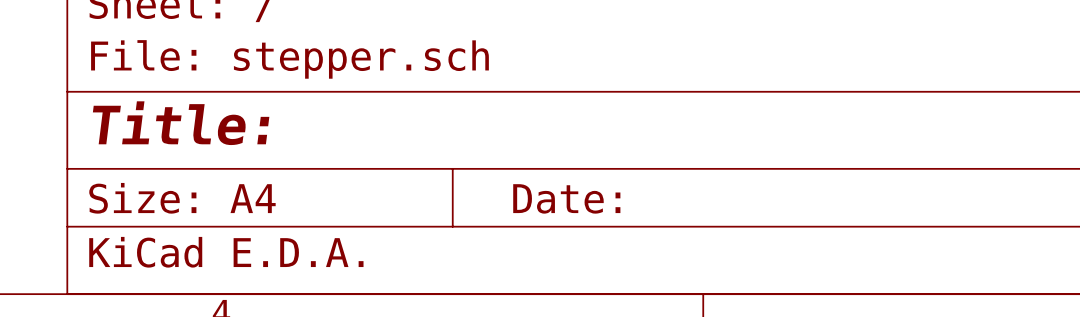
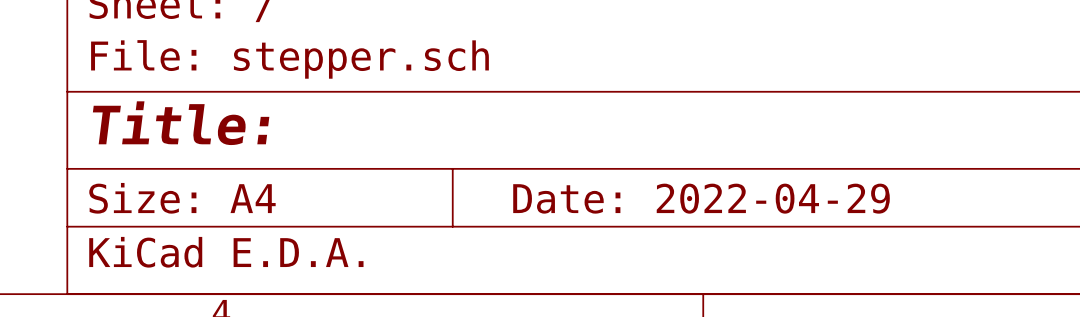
title block: Date: (566, 198) -> Date: 2022-04-29 (701, 198)

